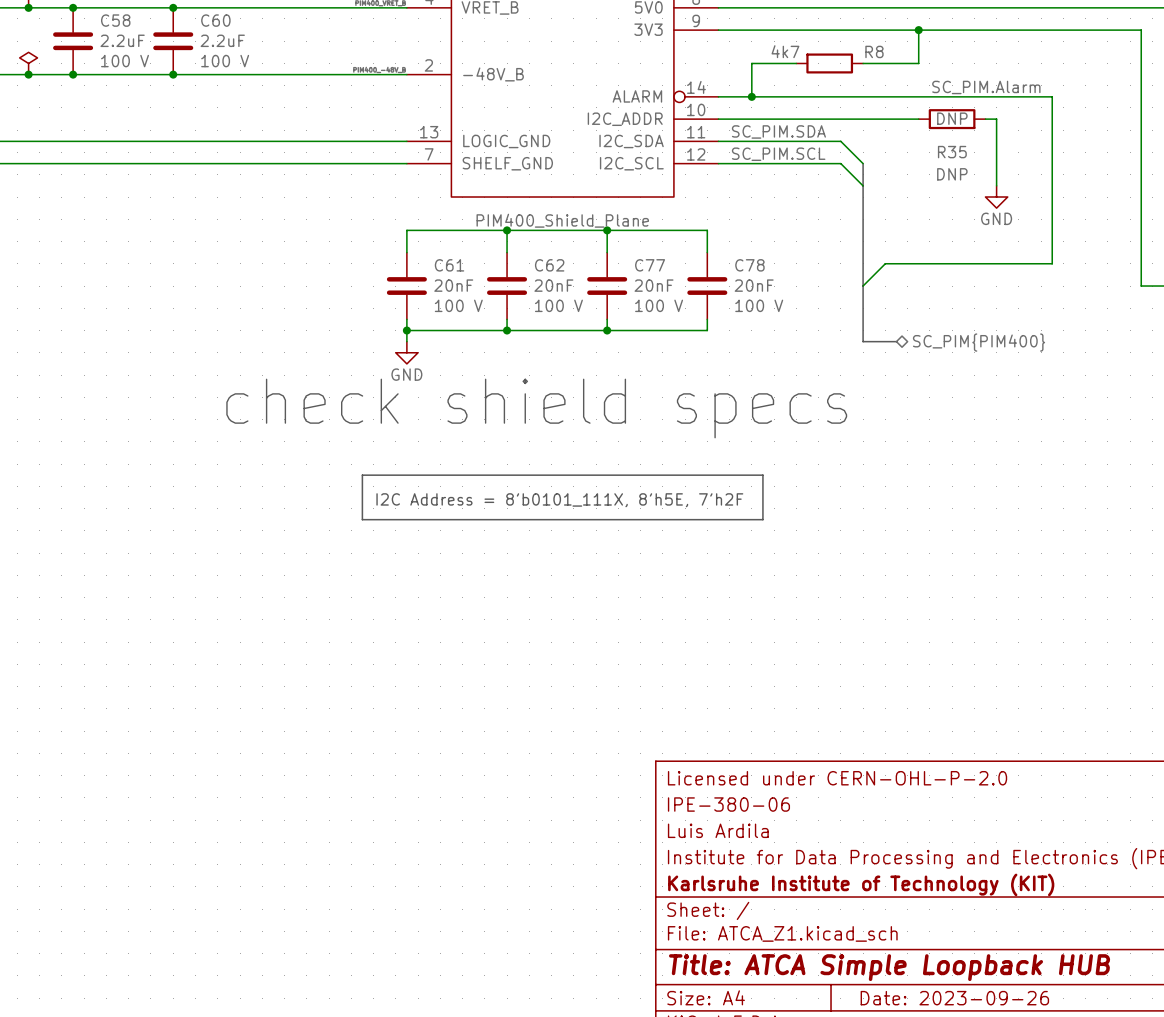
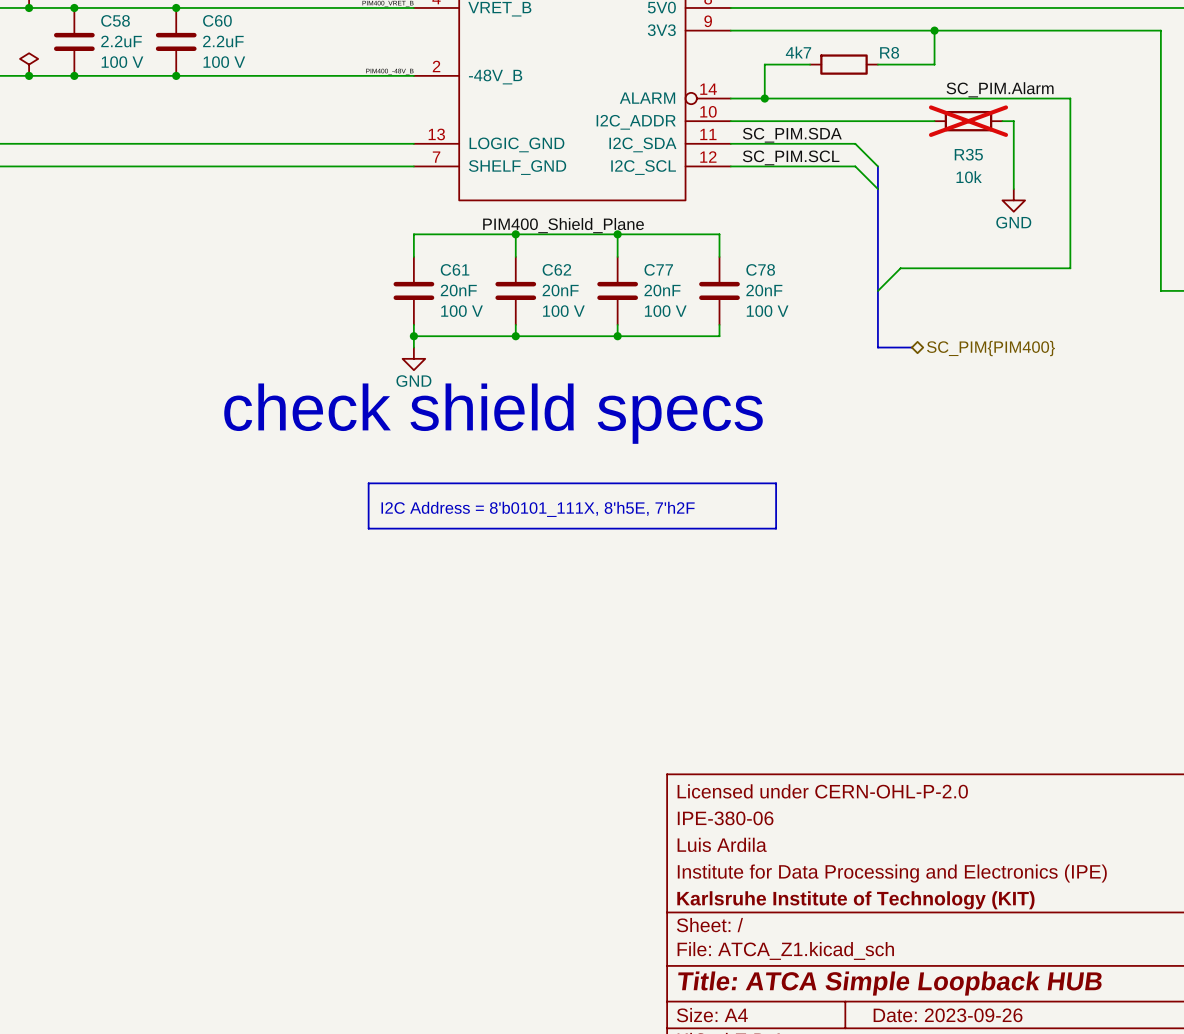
R35 text: DNP (952, 118) -> none
R35 do-not-place cross: none -> (968, 121)
R35 value: DNP (952, 174) -> 10k (969, 177)

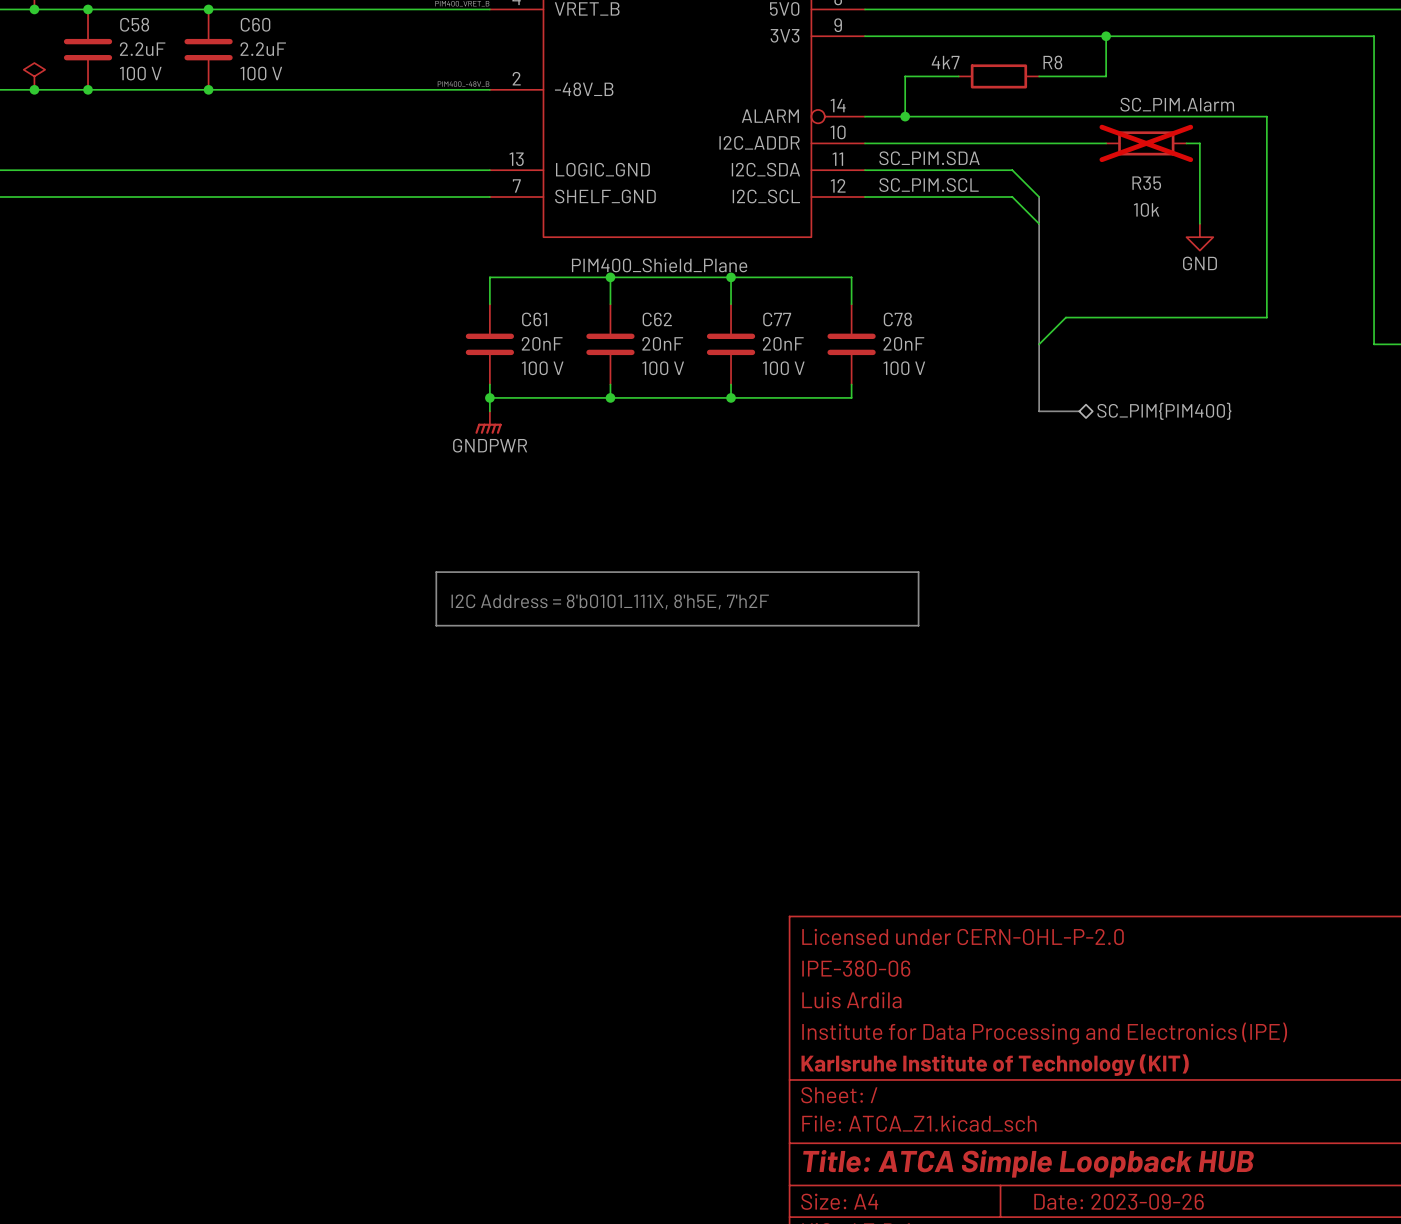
power symbol: GND (413, 358) -> GNDPWR (488, 422)
text: check shield specs (493, 413) -> none

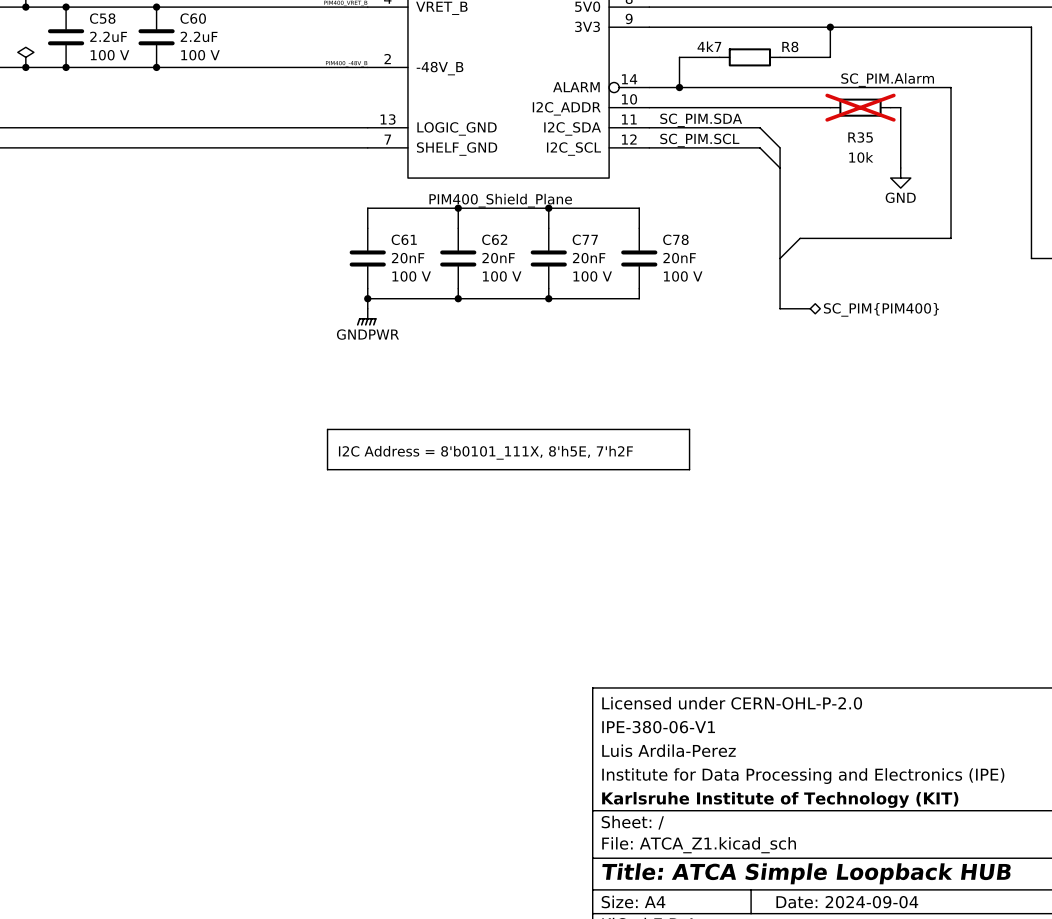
title block: IPE-380-06 (856, 968) -> IPE-380-06-V1 (658, 727)
title block: Luis Ardila (851, 1000) -> Luis Ardila-Perez (668, 750)
title block: Date: 2023-09-26 (1119, 1201) -> Date: 2024-09-04 (847, 902)

